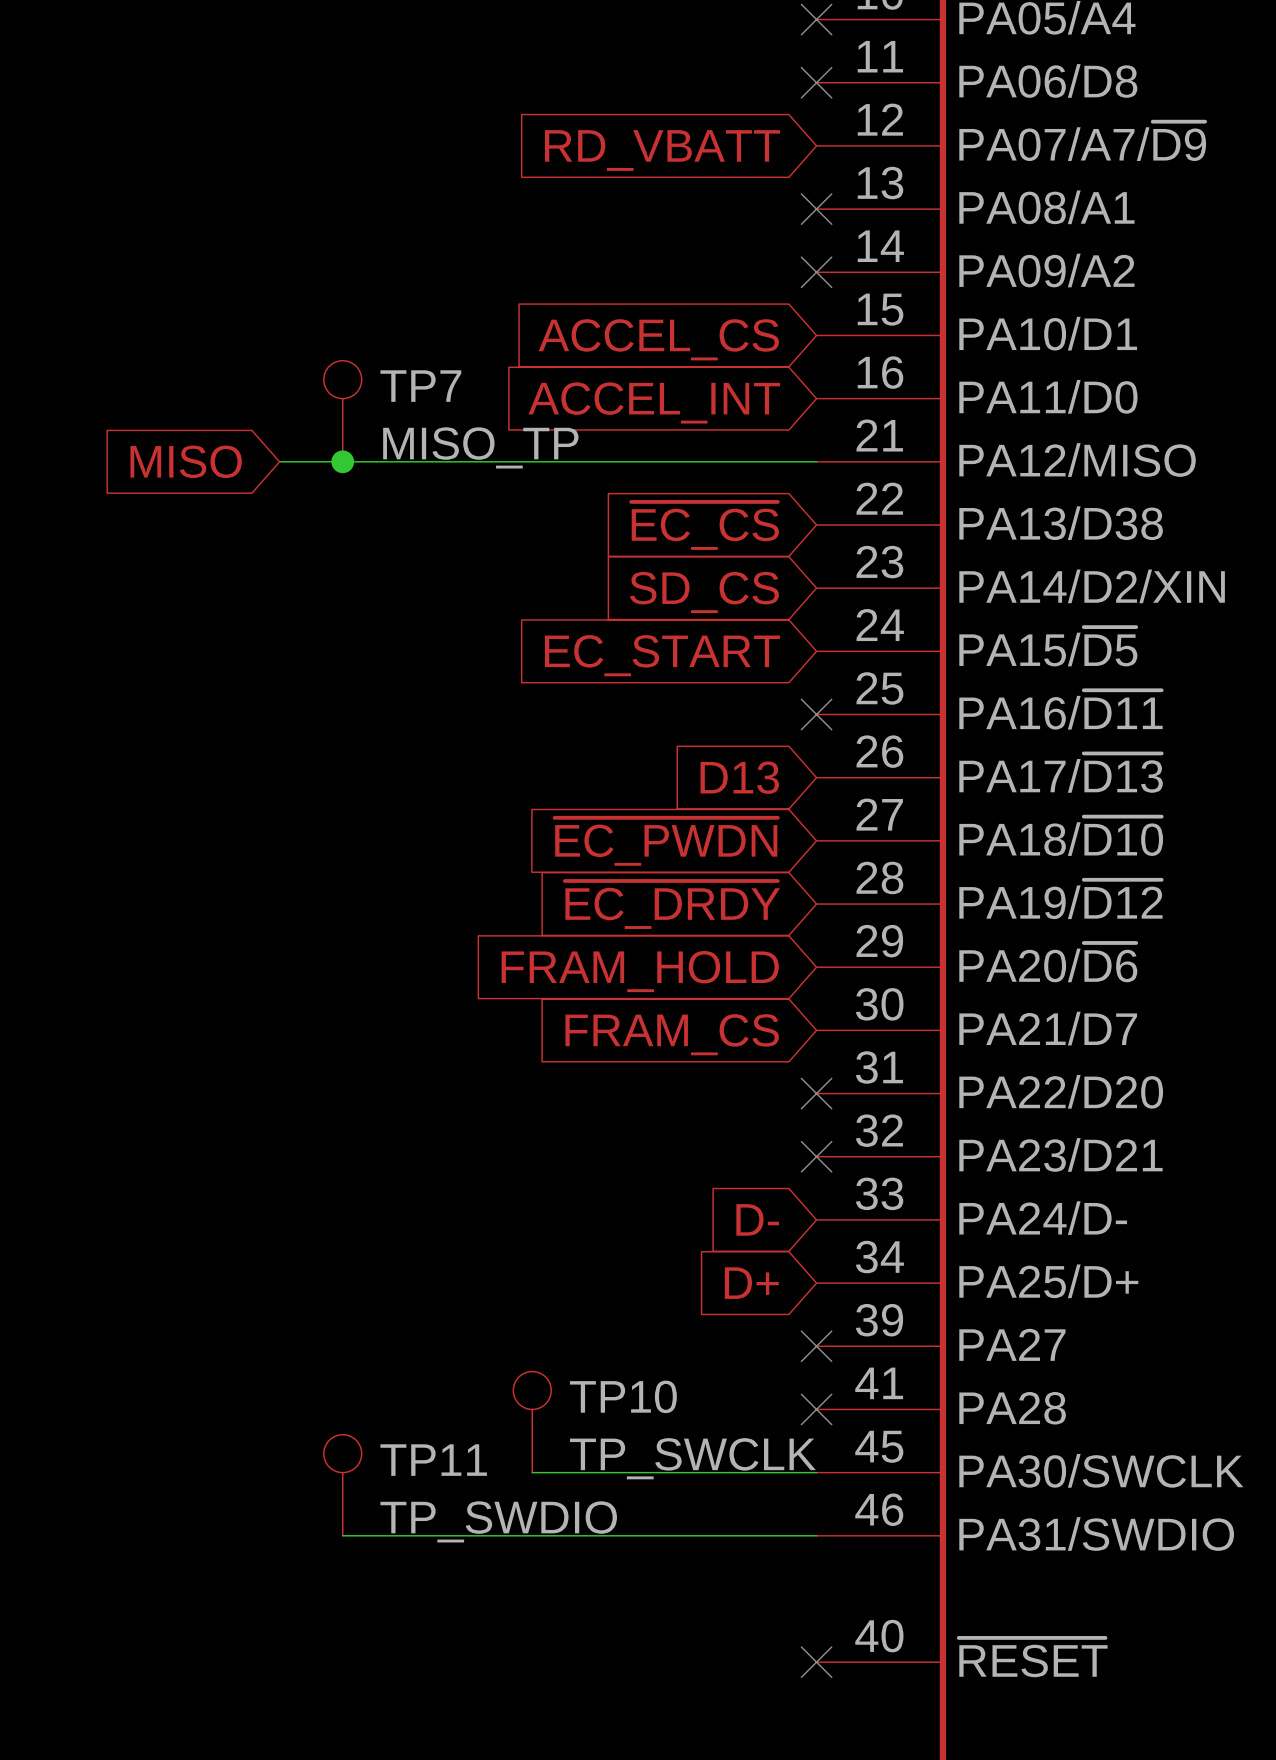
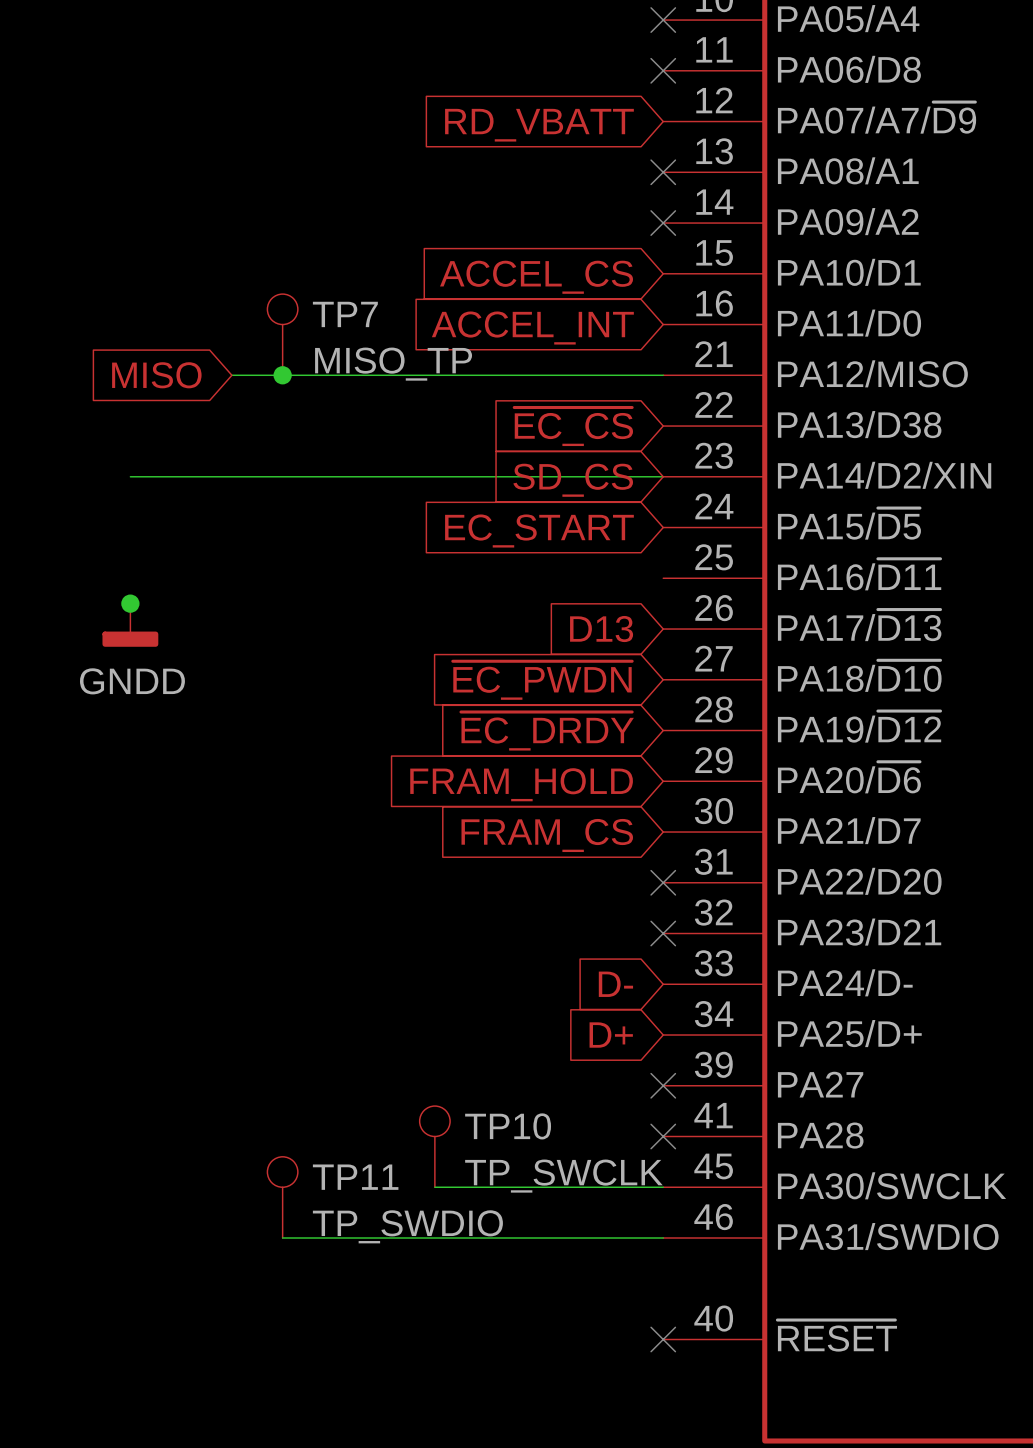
wire: none -> (130, 476) (663, 476)
no-connect mark: (816, 714) -> none
junction: none -> (130, 603)
power symbol: none -> GNDD (130, 625)

